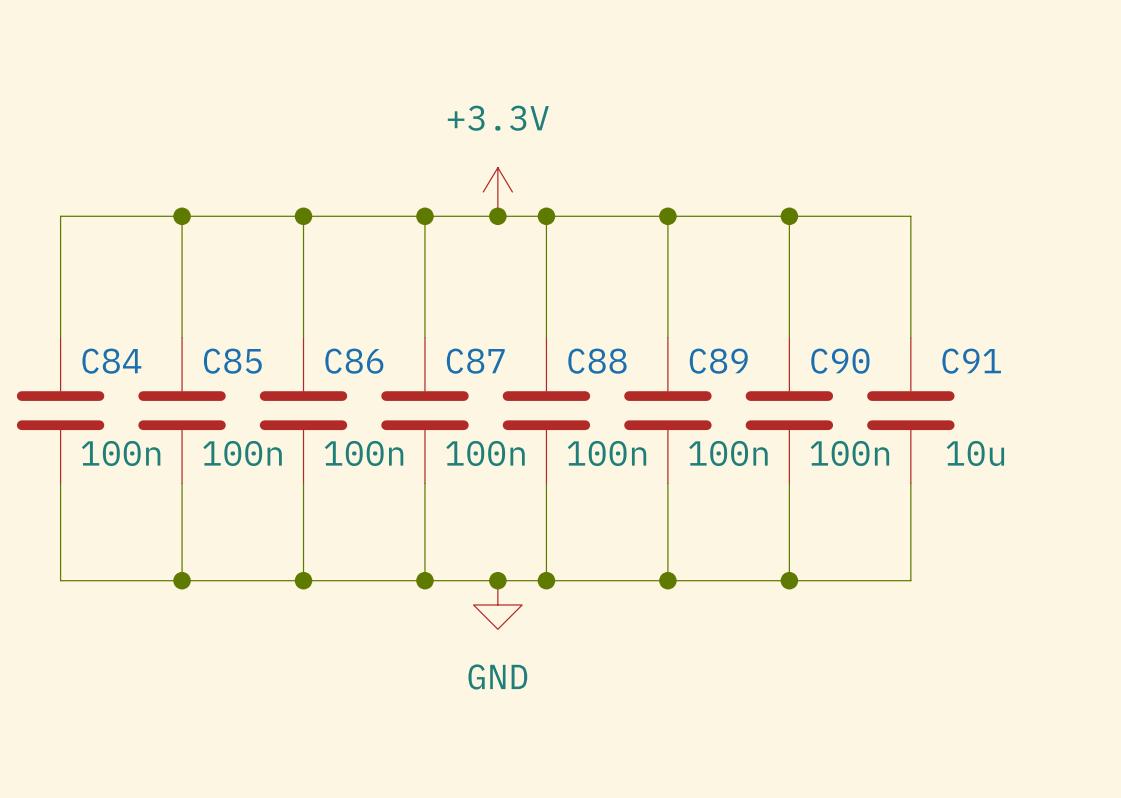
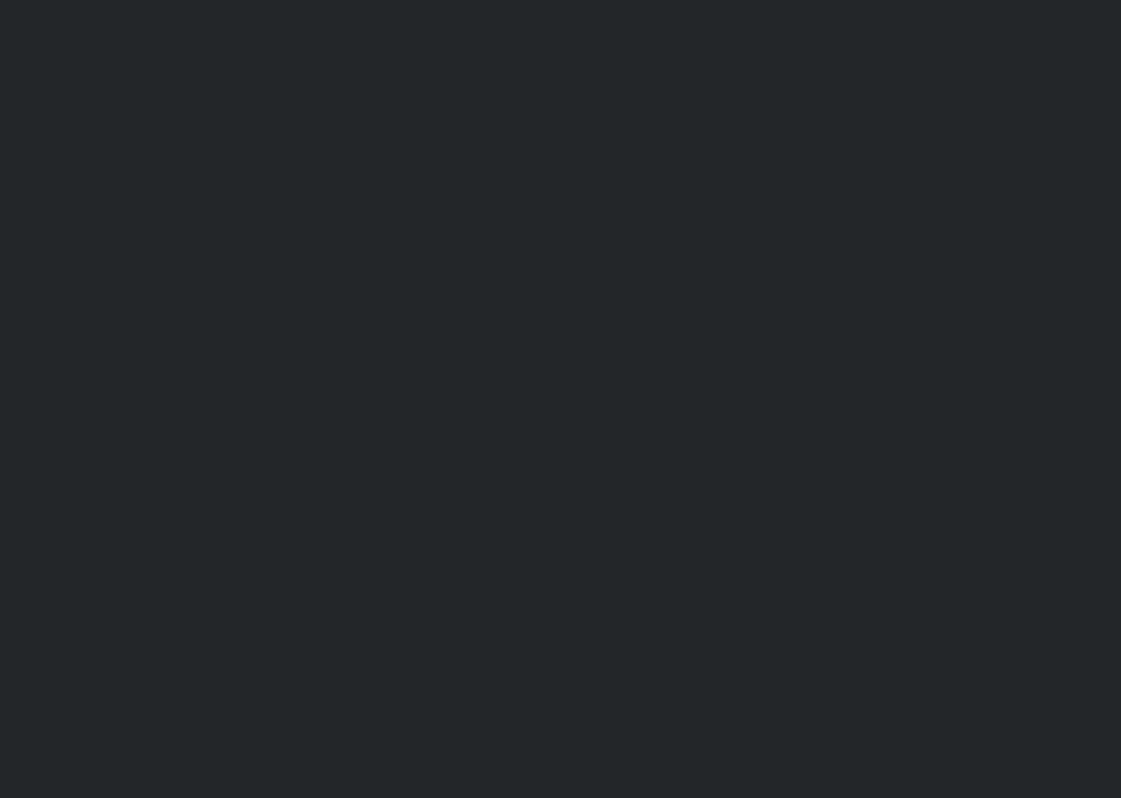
power symbol: +3.3V (497, 192) -> none
wire: (182, 216) (182, 337) -> none
junction: (182, 216) -> none
wire: (303, 216) (303, 337) -> none
junction: (303, 216) -> none
wire: (424, 216) (424, 337) -> none
junction: (424, 216) -> none
junction: (497, 216) -> none
wire: (546, 216) (546, 337) -> none
junction: (546, 216) -> none
wire: (667, 216) (667, 337) -> none
junction: (667, 216) -> none
wire: (789, 216) (789, 337) -> none
junction: (789, 216) -> none
wire: (60, 337) (60, 216) (910, 216) (910, 337) -> none
C84: 100n (60, 410) -> none
C85: 100n (182, 410) -> none
C86: 100n (303, 410) -> none
C87: 100n (424, 410) -> none
C88: 100n (546, 410) -> none
C89: 100n (667, 410) -> none
C90: 100n (789, 410) -> none
C91: 10u (910, 410) -> none
wire: (60, 483) (60, 580) (910, 580) (910, 483) -> none
wire: (182, 483) (182, 580) -> none
wire: (303, 483) (303, 580) -> none
wire: (424, 483) (424, 580) -> none
wire: (546, 483) (546, 580) -> none
wire: (667, 483) (667, 580) -> none
wire: (789, 483) (789, 580) -> none
junction: (182, 580) -> none
junction: (303, 580) -> none
junction: (424, 580) -> none
junction: (497, 580) -> none
junction: (546, 580) -> none
junction: (667, 580) -> none
junction: (789, 580) -> none
power symbol: GND (497, 604) -> none

